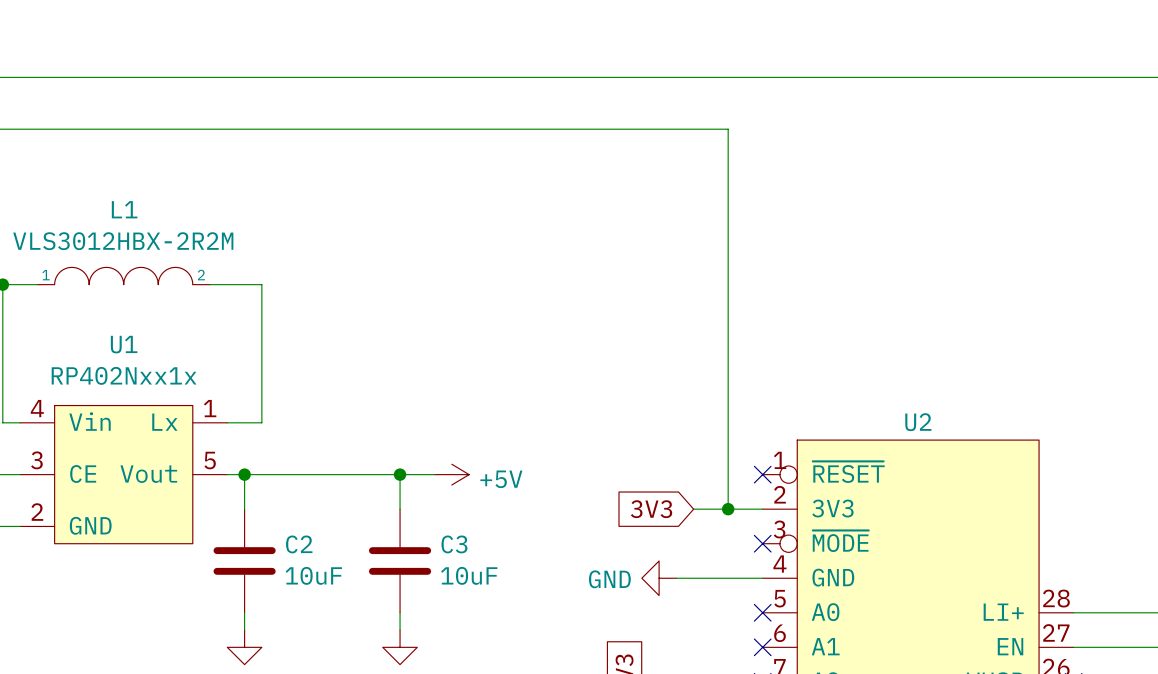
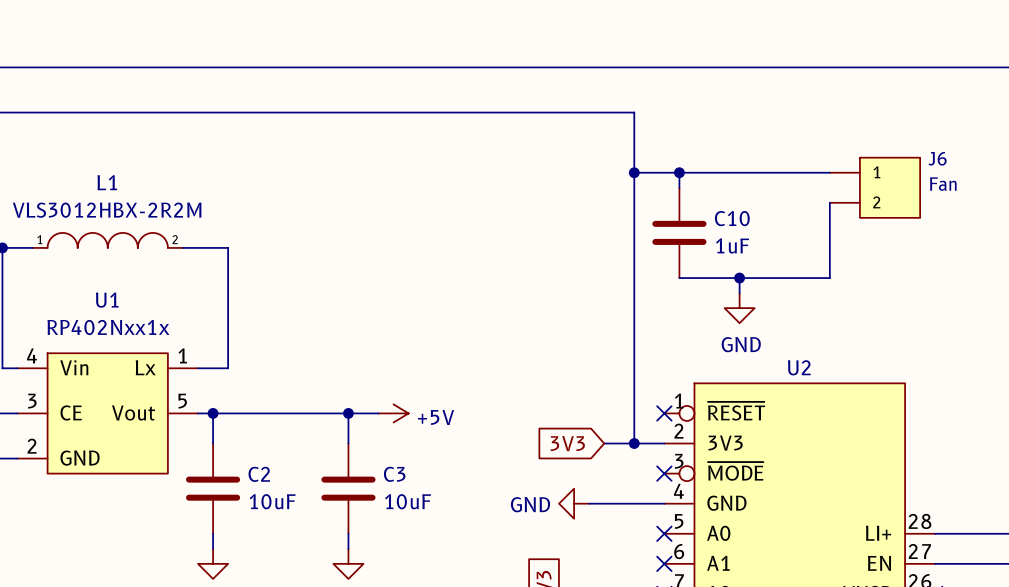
wire: none -> (634, 172) (829, 172)
junction: none -> (634, 172)
wire: none -> (679, 172) (679, 187)
junction: none -> (679, 172)
J6: none -> Fan (874, 187)
wire: none -> (829, 202) (829, 278) (679, 278)
C10: none -> 1uF (679, 232)
wire: none -> (739, 278) (739, 293)
junction: none -> (739, 278)
power symbol: none -> GND (739, 308)

